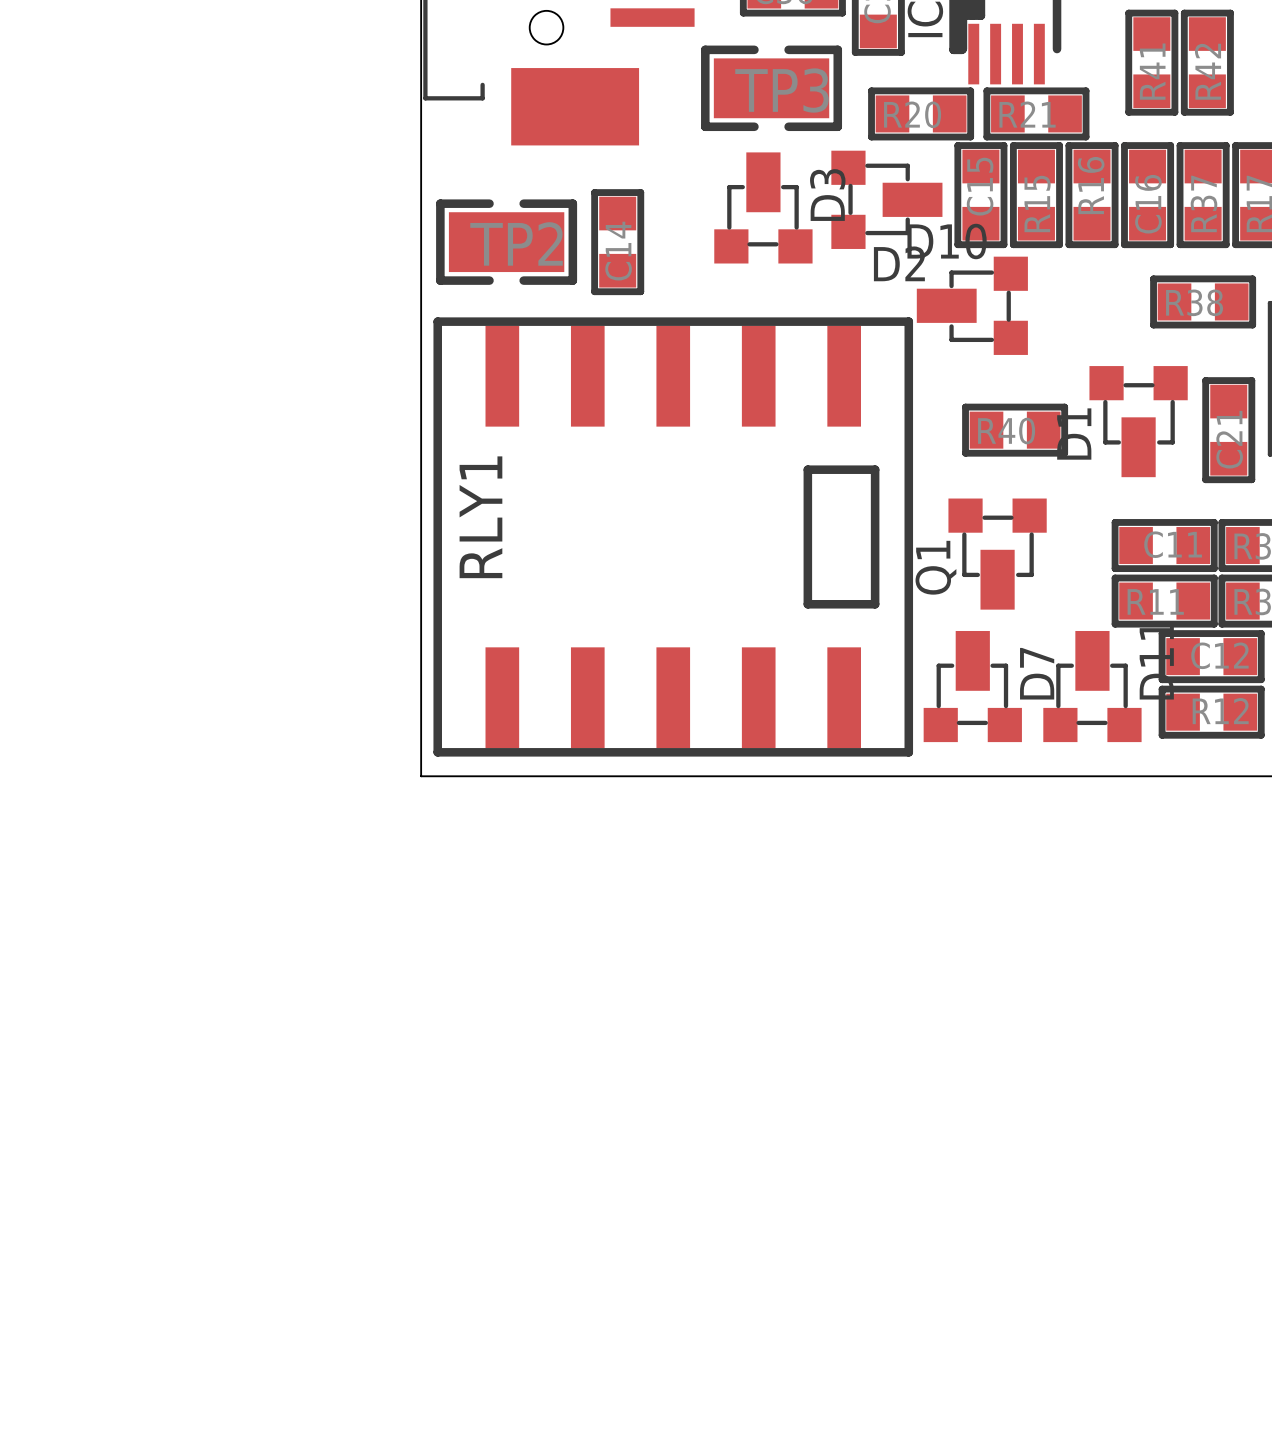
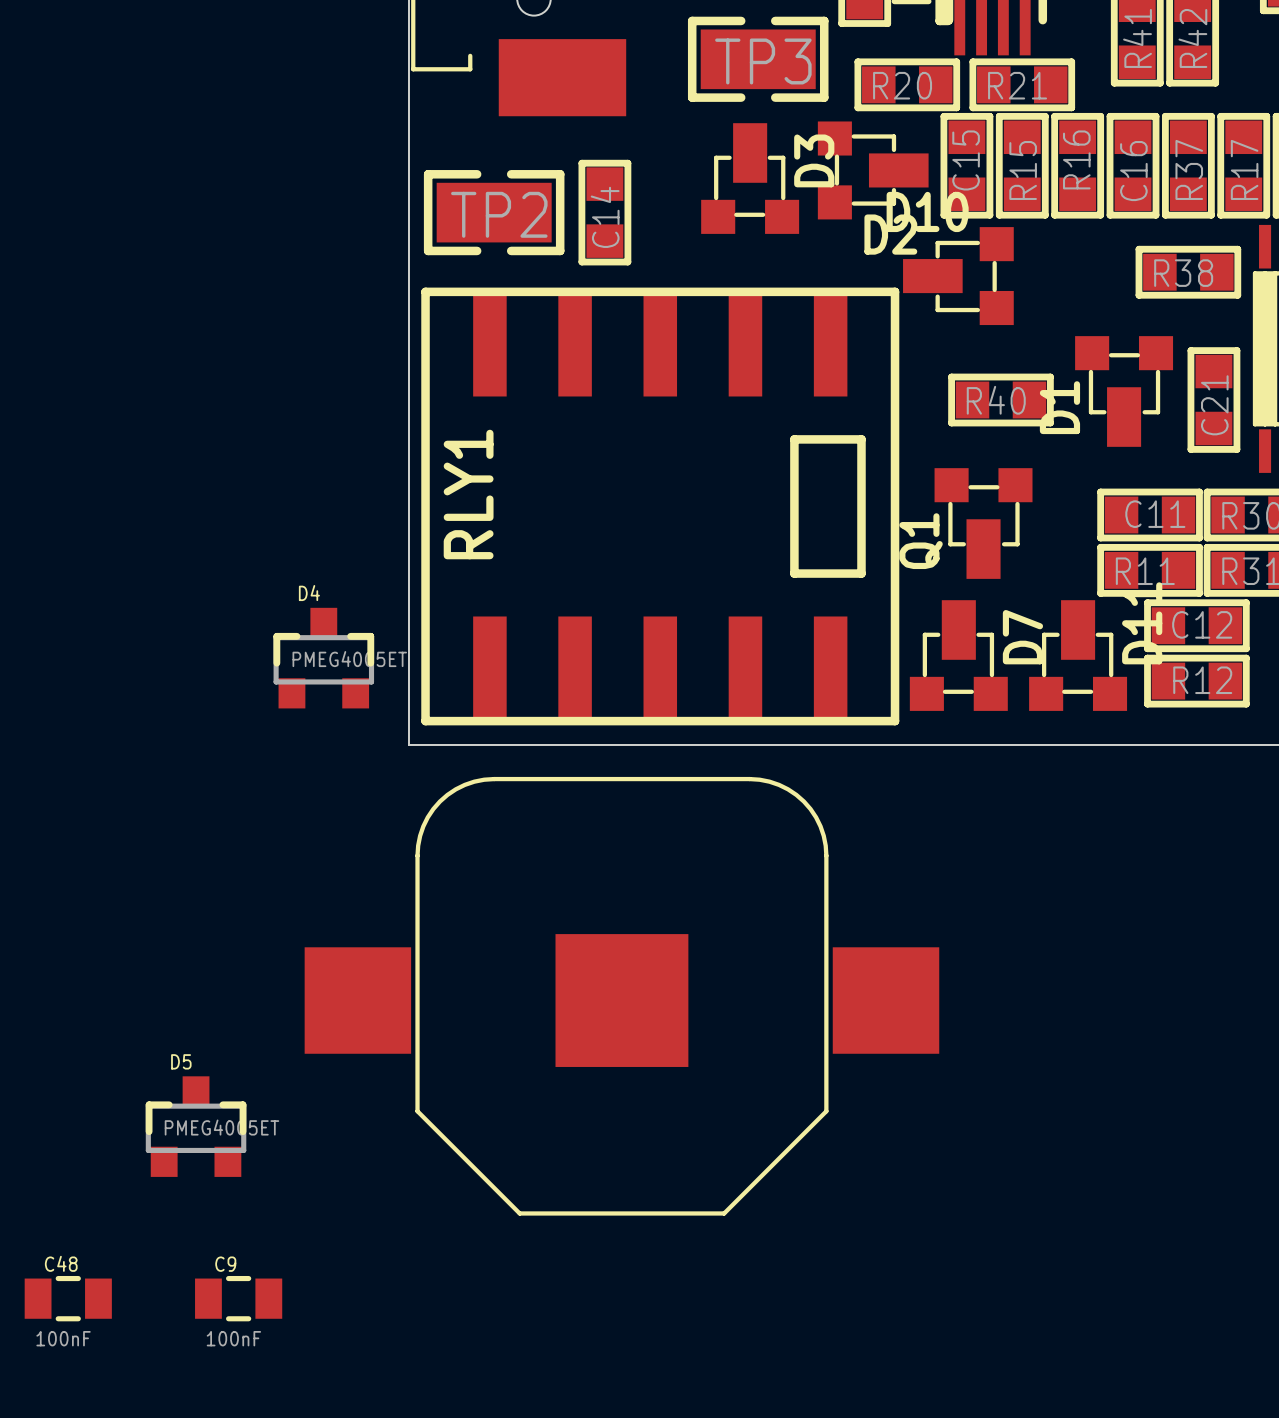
D4: none -> PMEG4005ET (323, 658)
part: none -> (621, 996)
D5: none -> PMEG4005ET (196, 1126)
C48: none -> 100nF (68, 1298)
C9: none -> 100nF (238, 1298)

